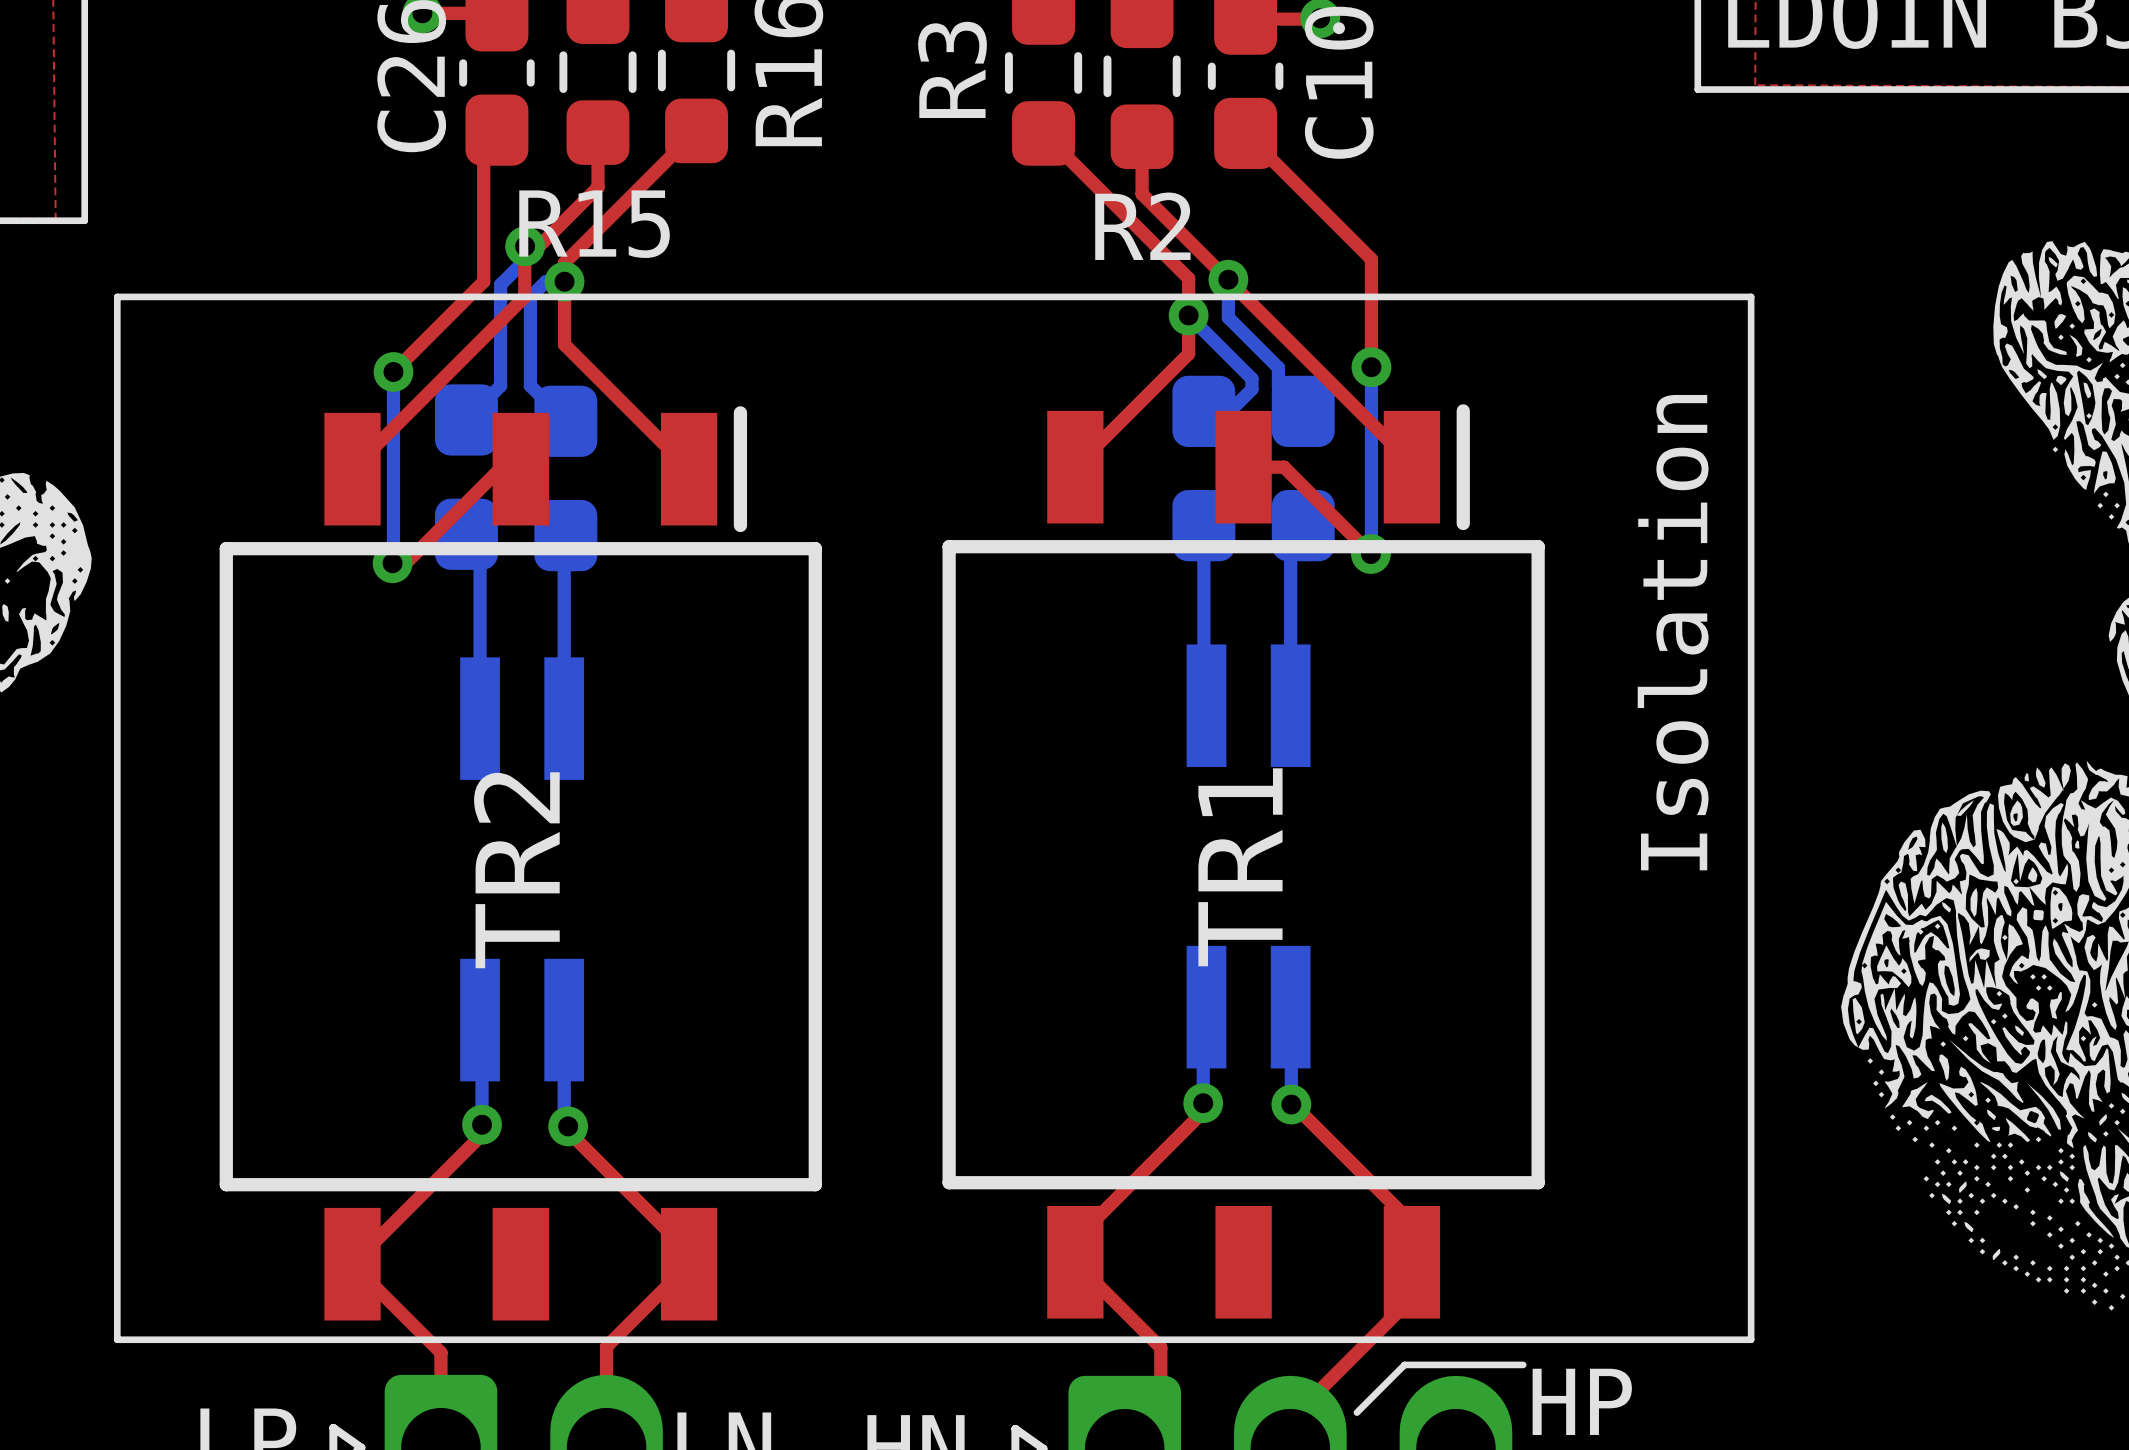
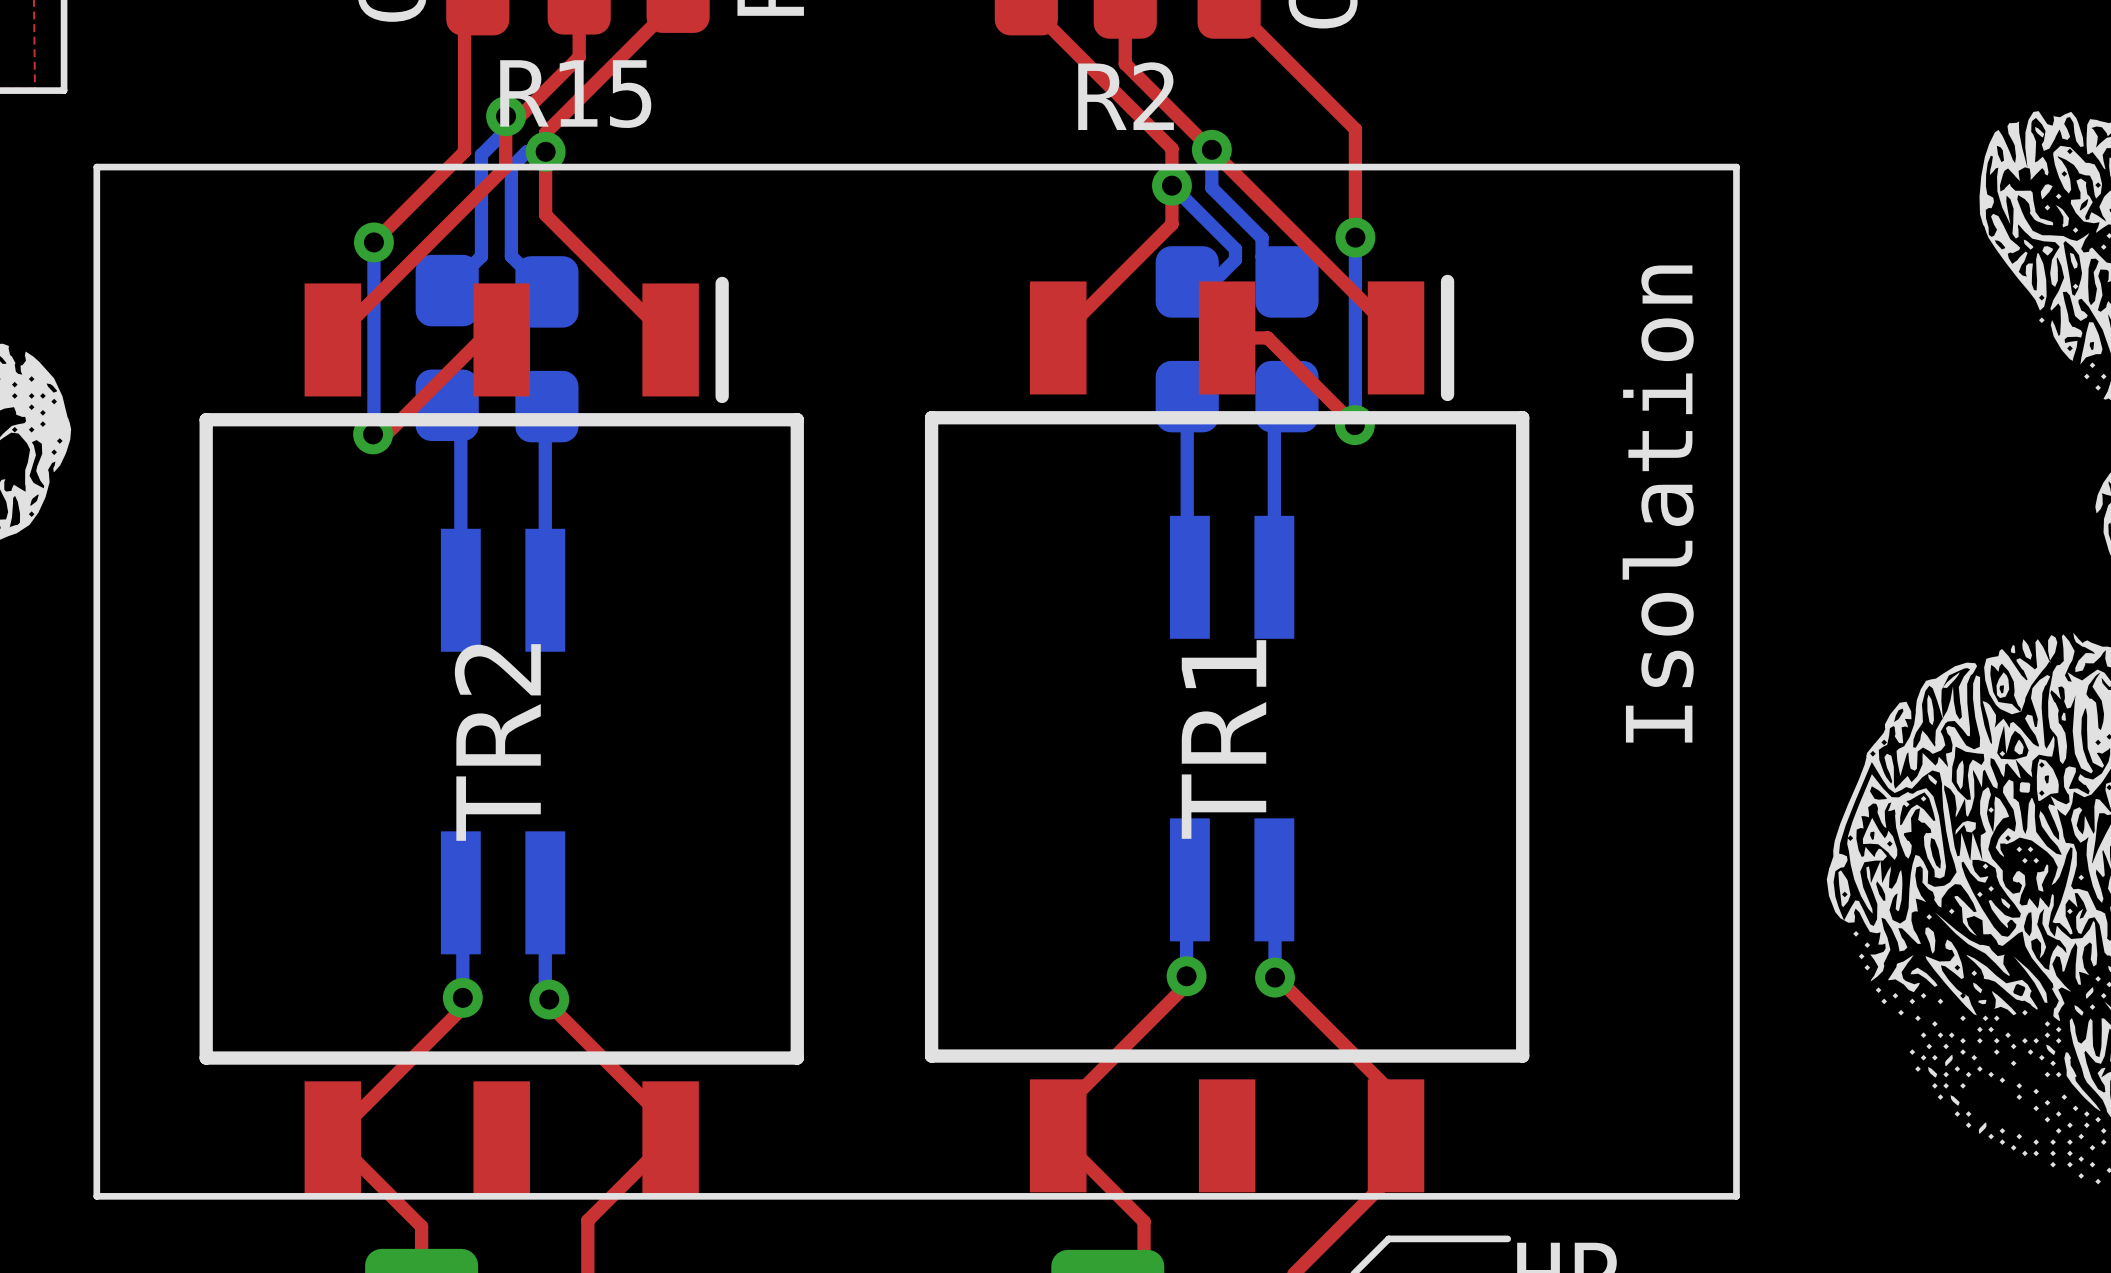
line: (117, 1322) (117, 1339) (1751, 1339) (1751, 1322) -> (96, 1196) (1736, 1196)

